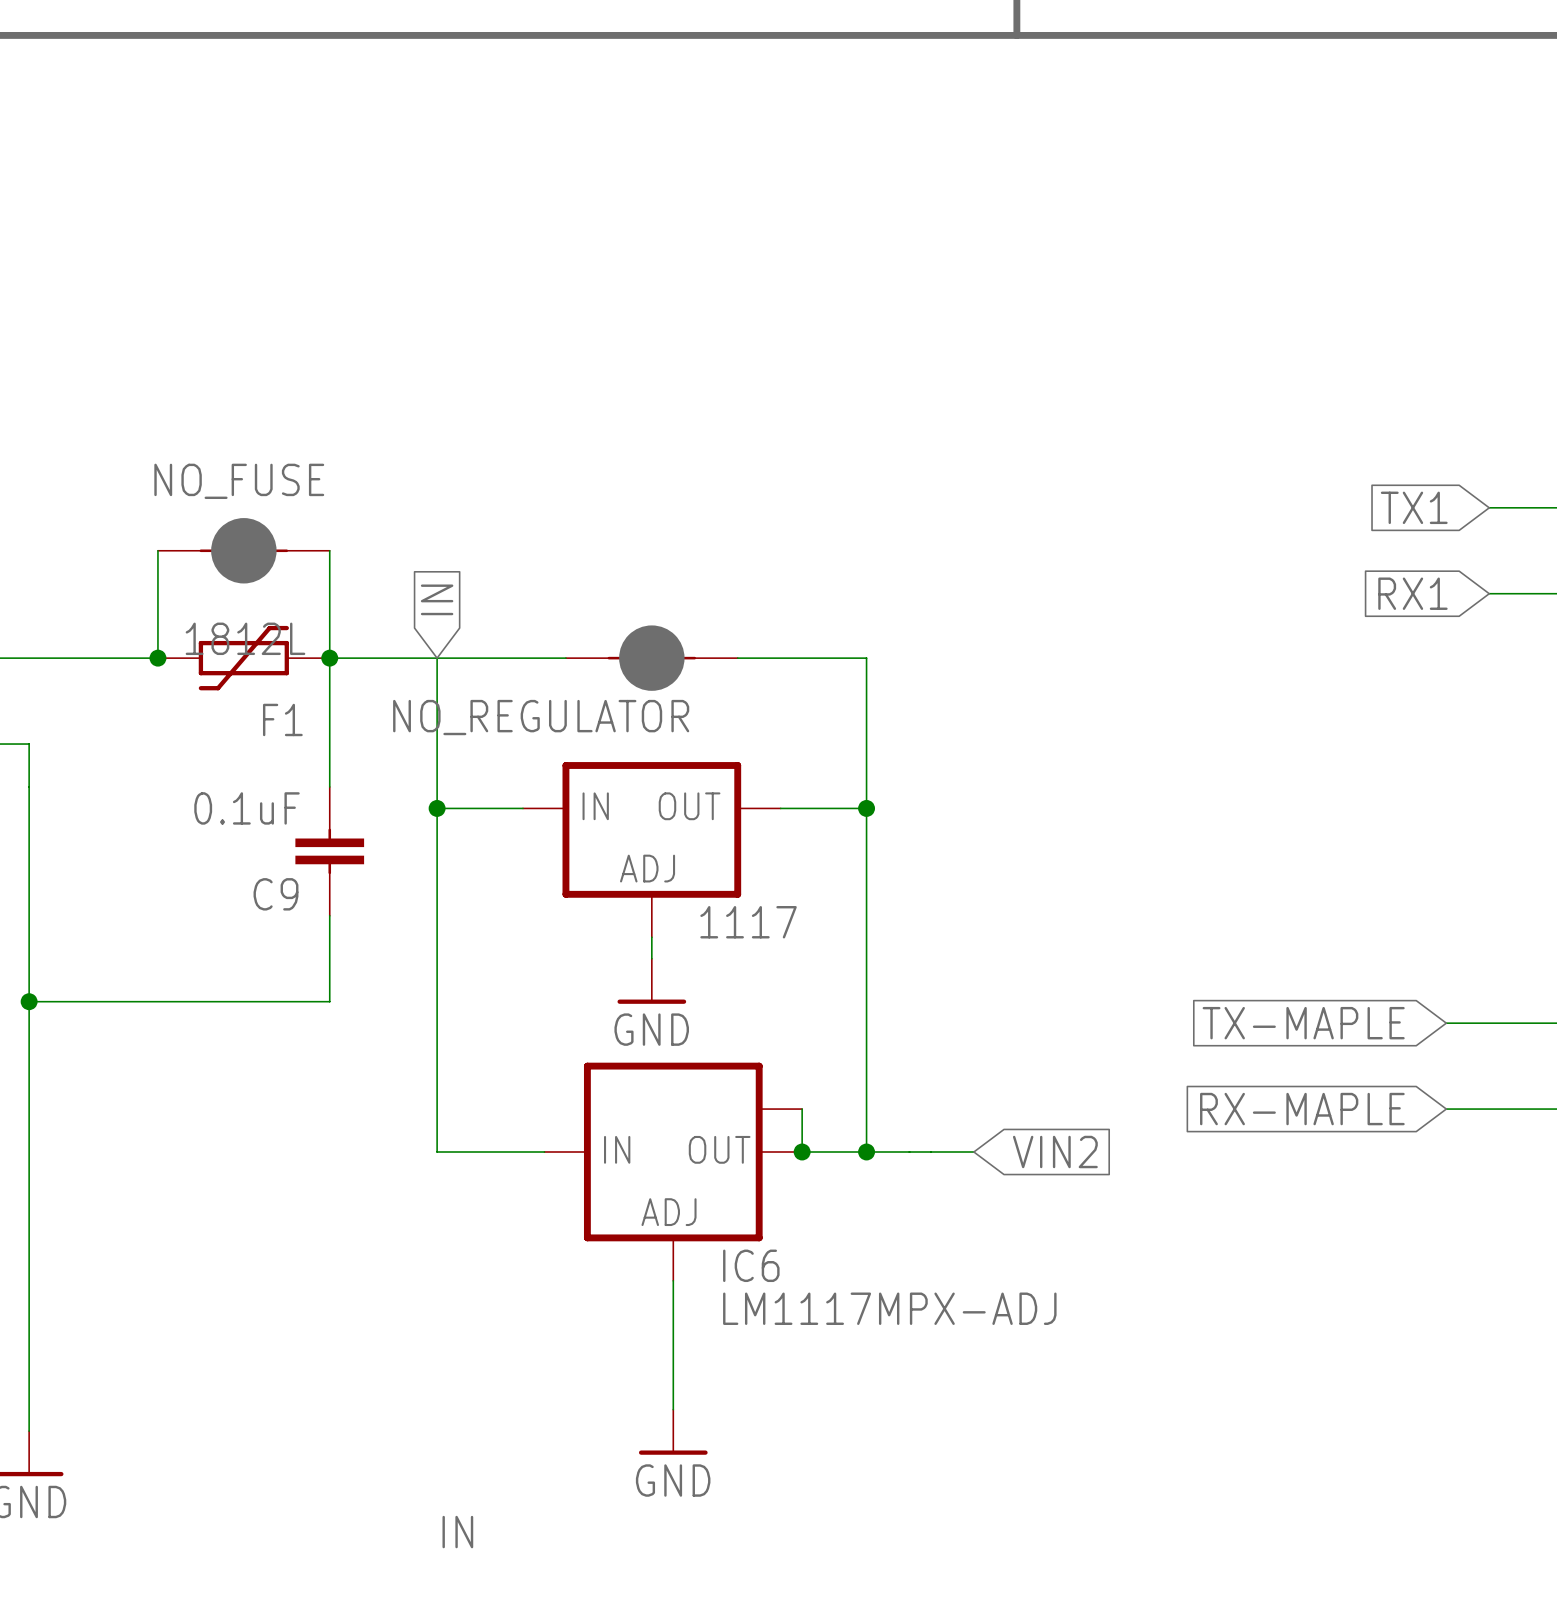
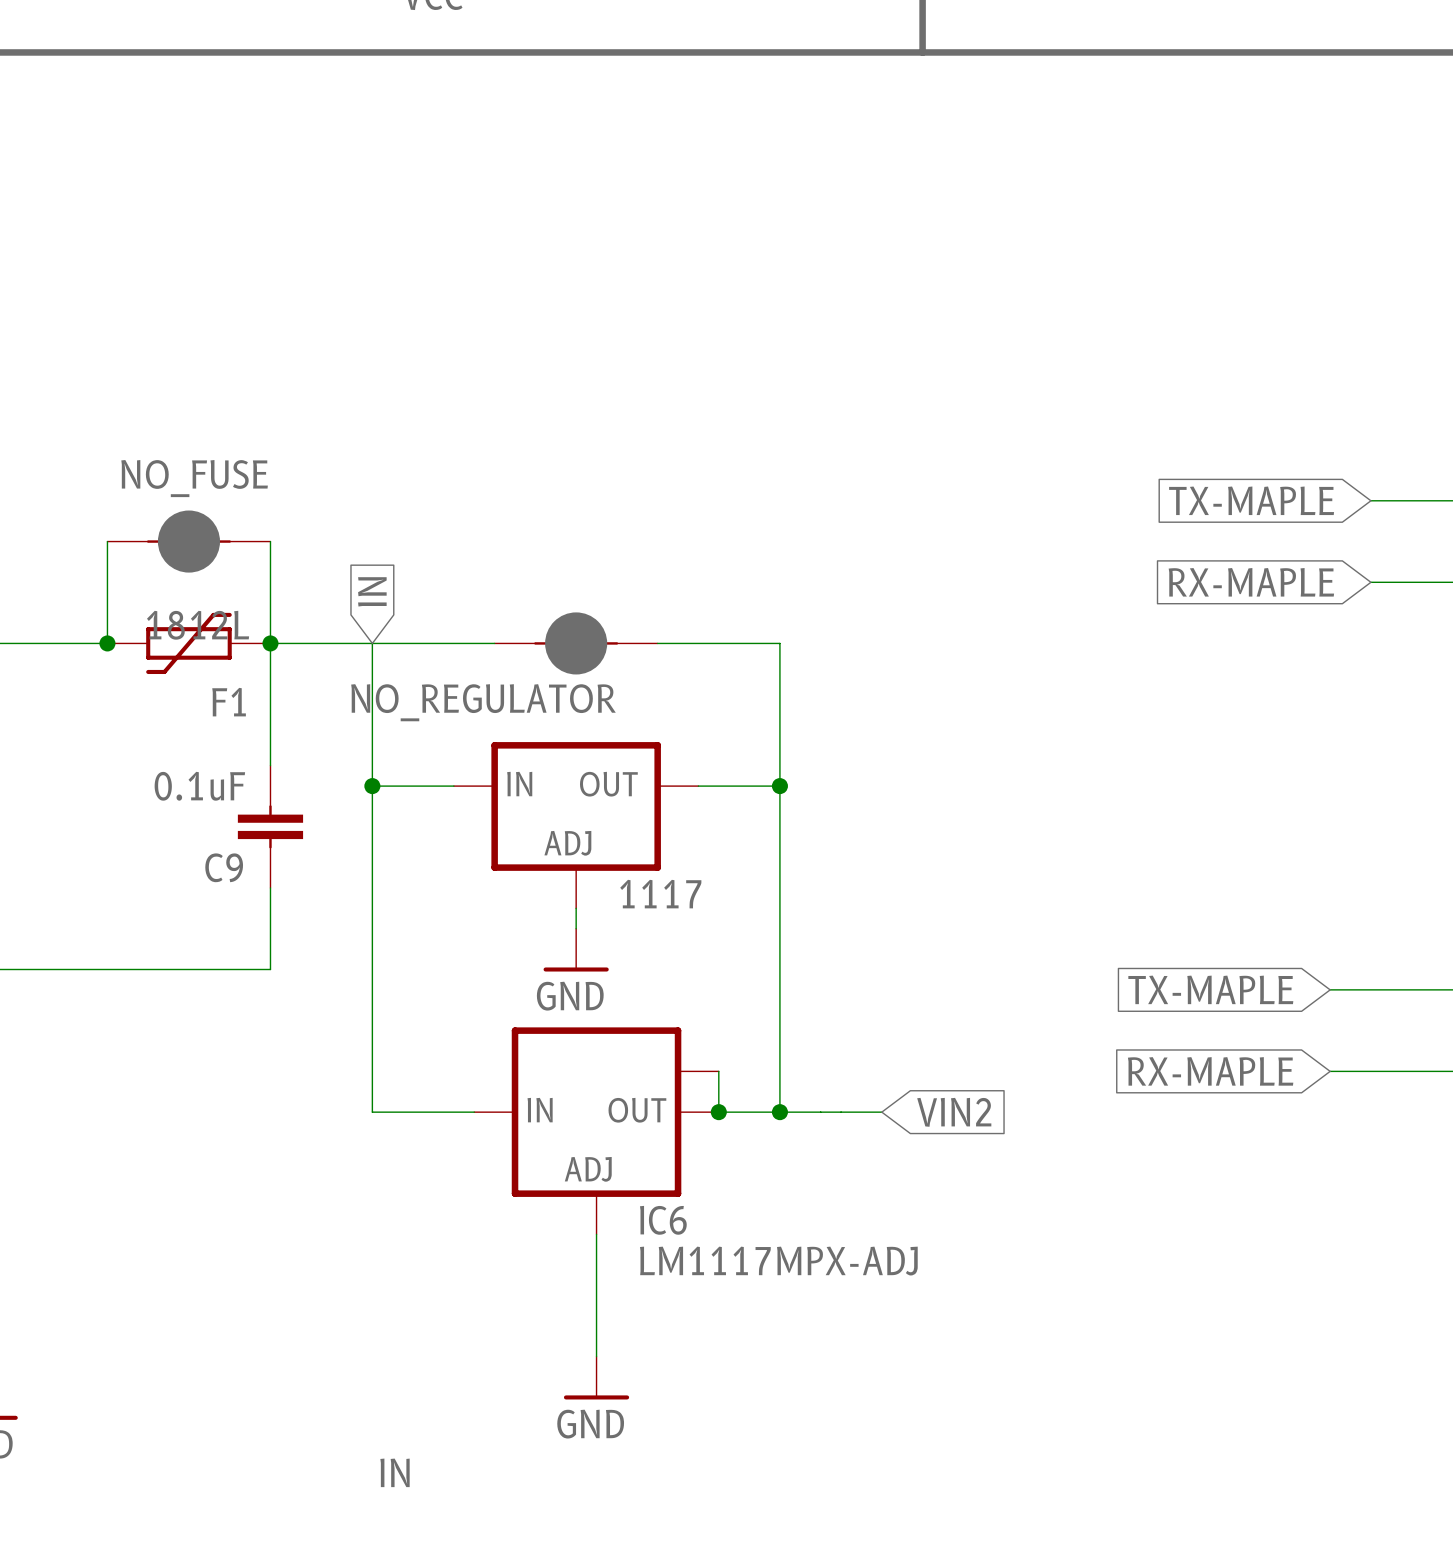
global label: TX1 (1414, 507) -> TX-MAPLE (1251, 500)
global label: RX1 (1412, 593) -> RX-MAPLE (1251, 582)

